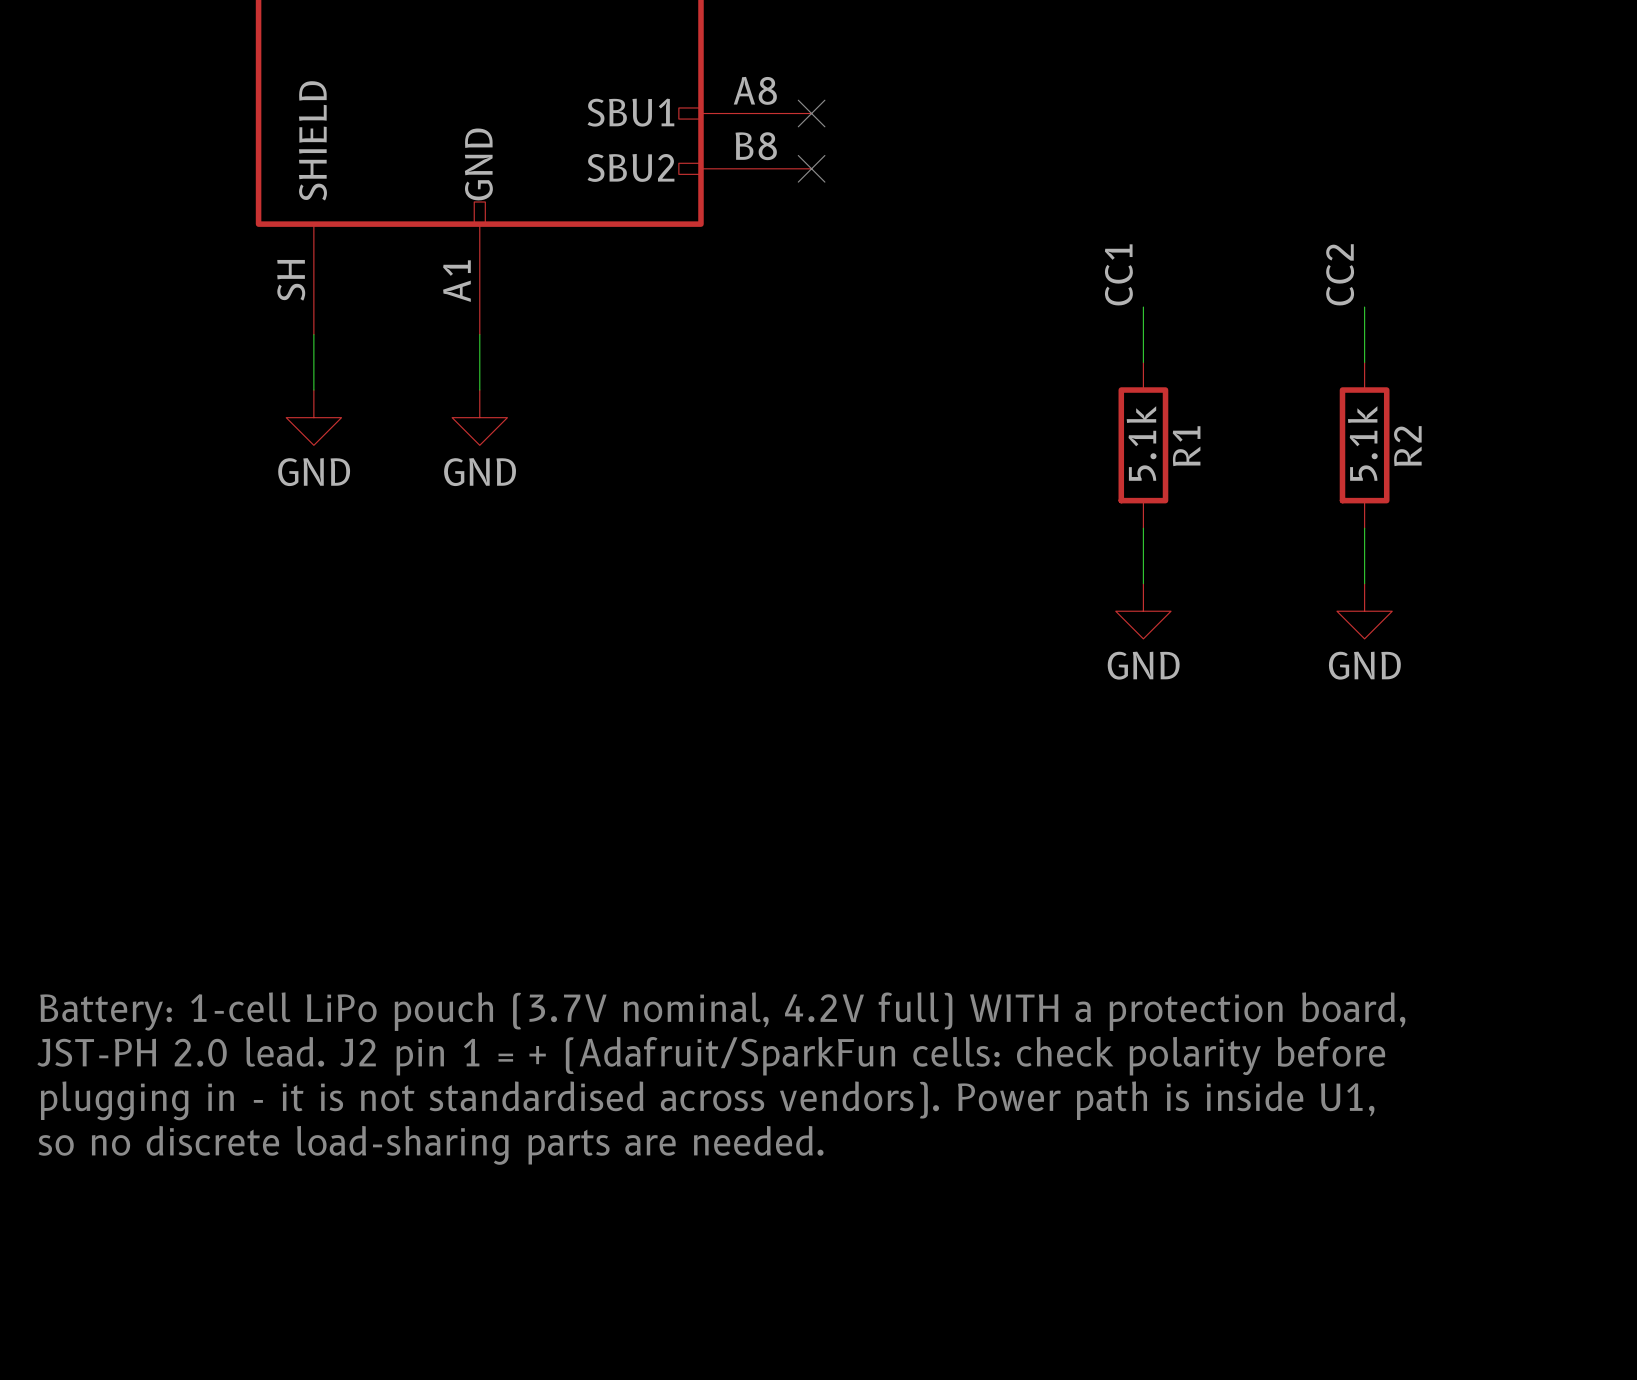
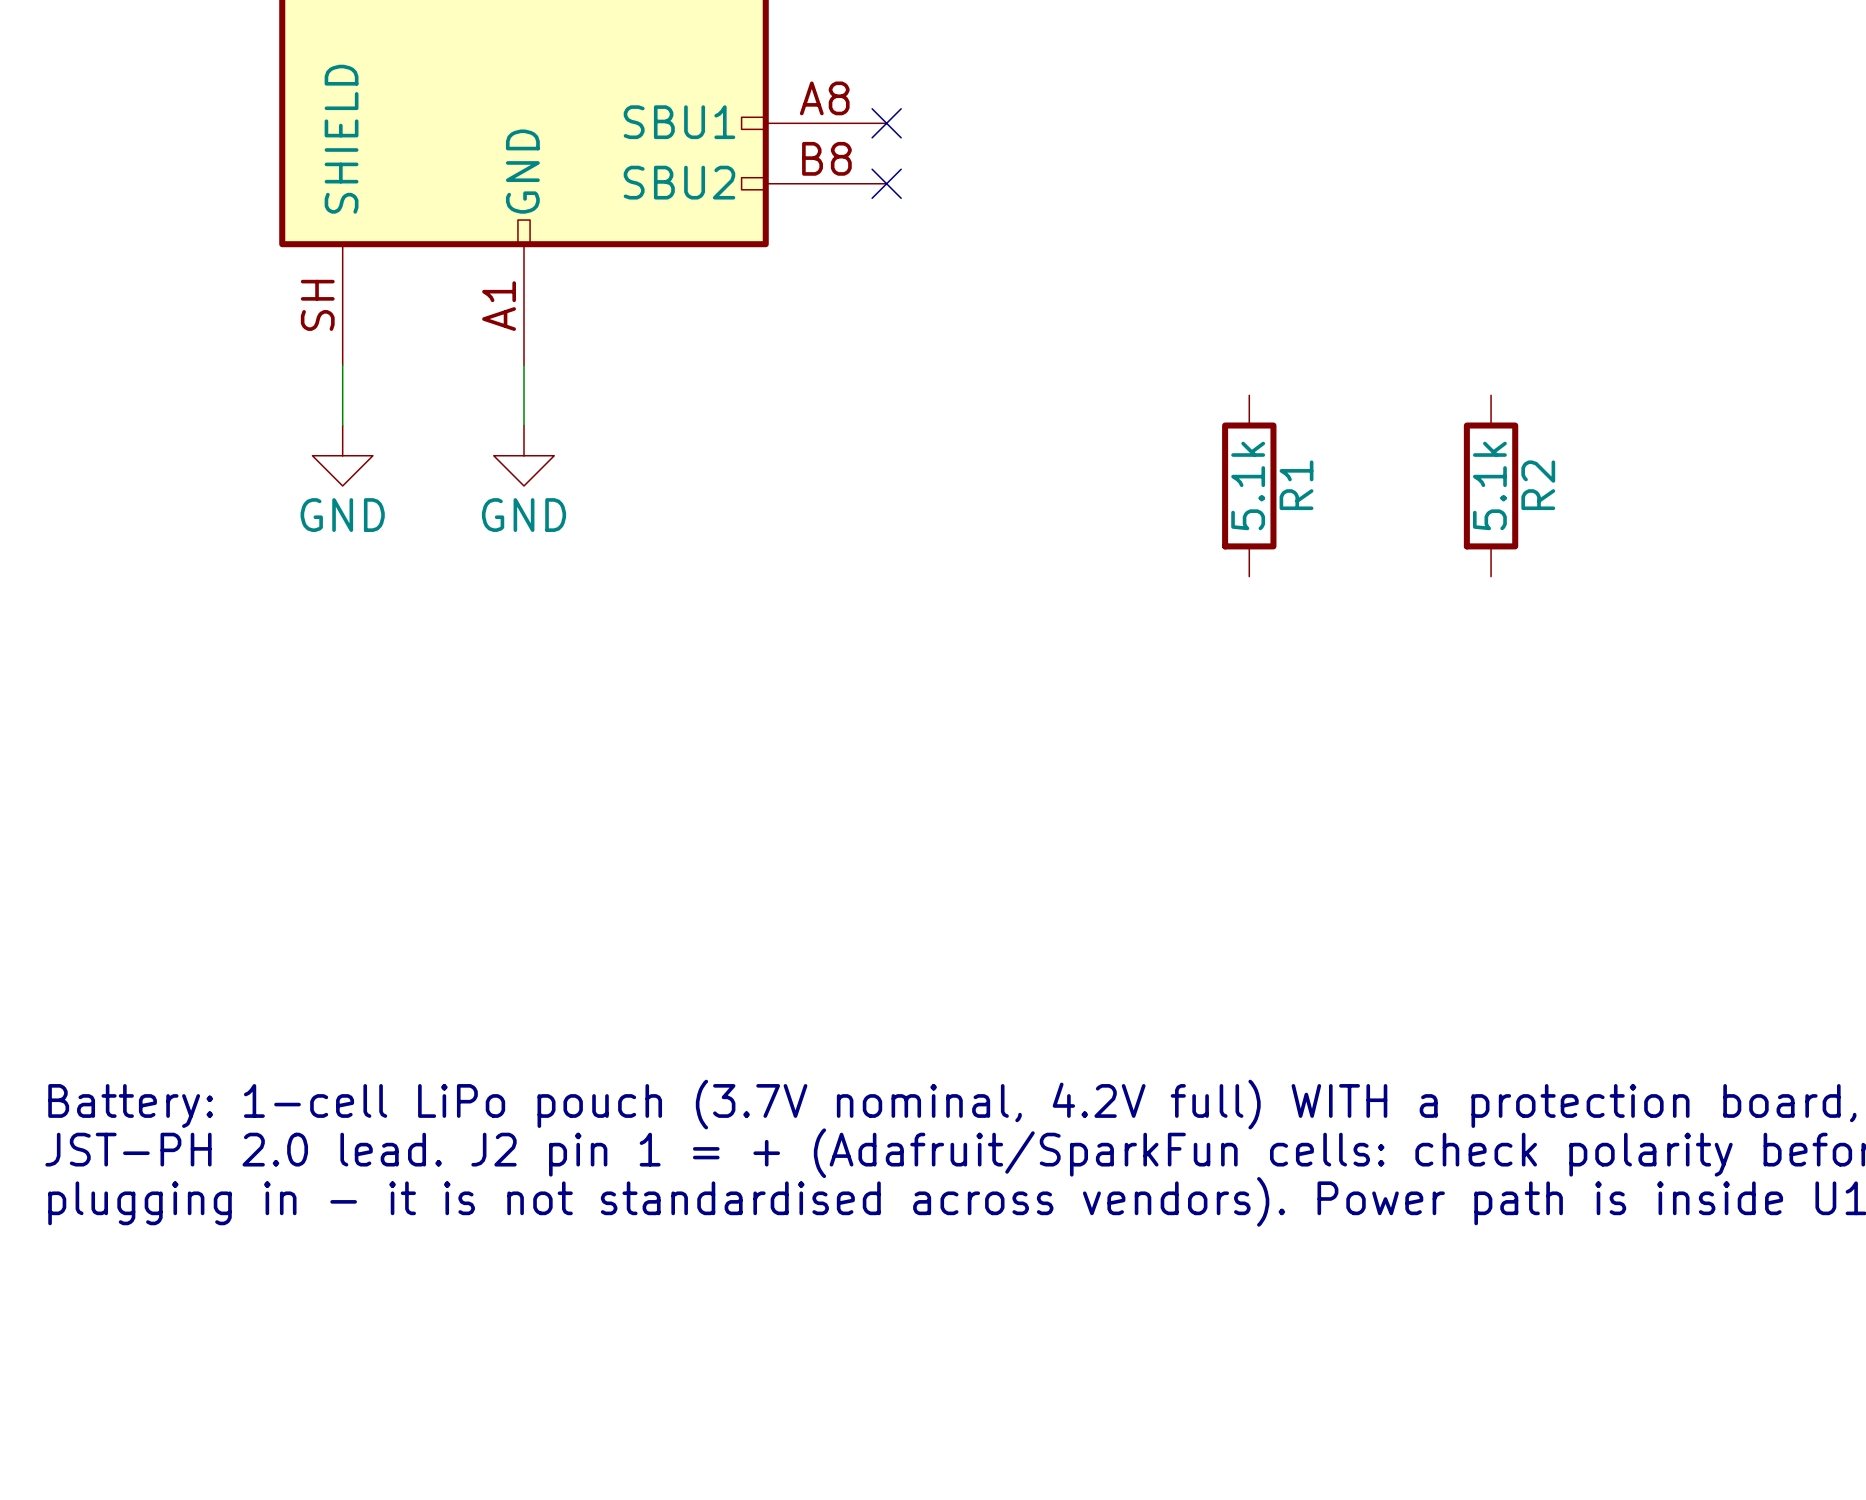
label: CC1 (1118, 274) -> none
label: CC2 (1340, 274) -> none
wire: (1143, 307) (1143, 362) -> none
wire: (1364, 307) (1364, 362) -> none
wire: (1143, 528) (1143, 583) -> none
wire: (1364, 528) (1364, 583) -> none
power symbol: GND (1143, 611) -> none
power symbol: GND (1364, 611) -> none
text: so no discrete load-sharing parts are needed. (431, 1145) -> none

